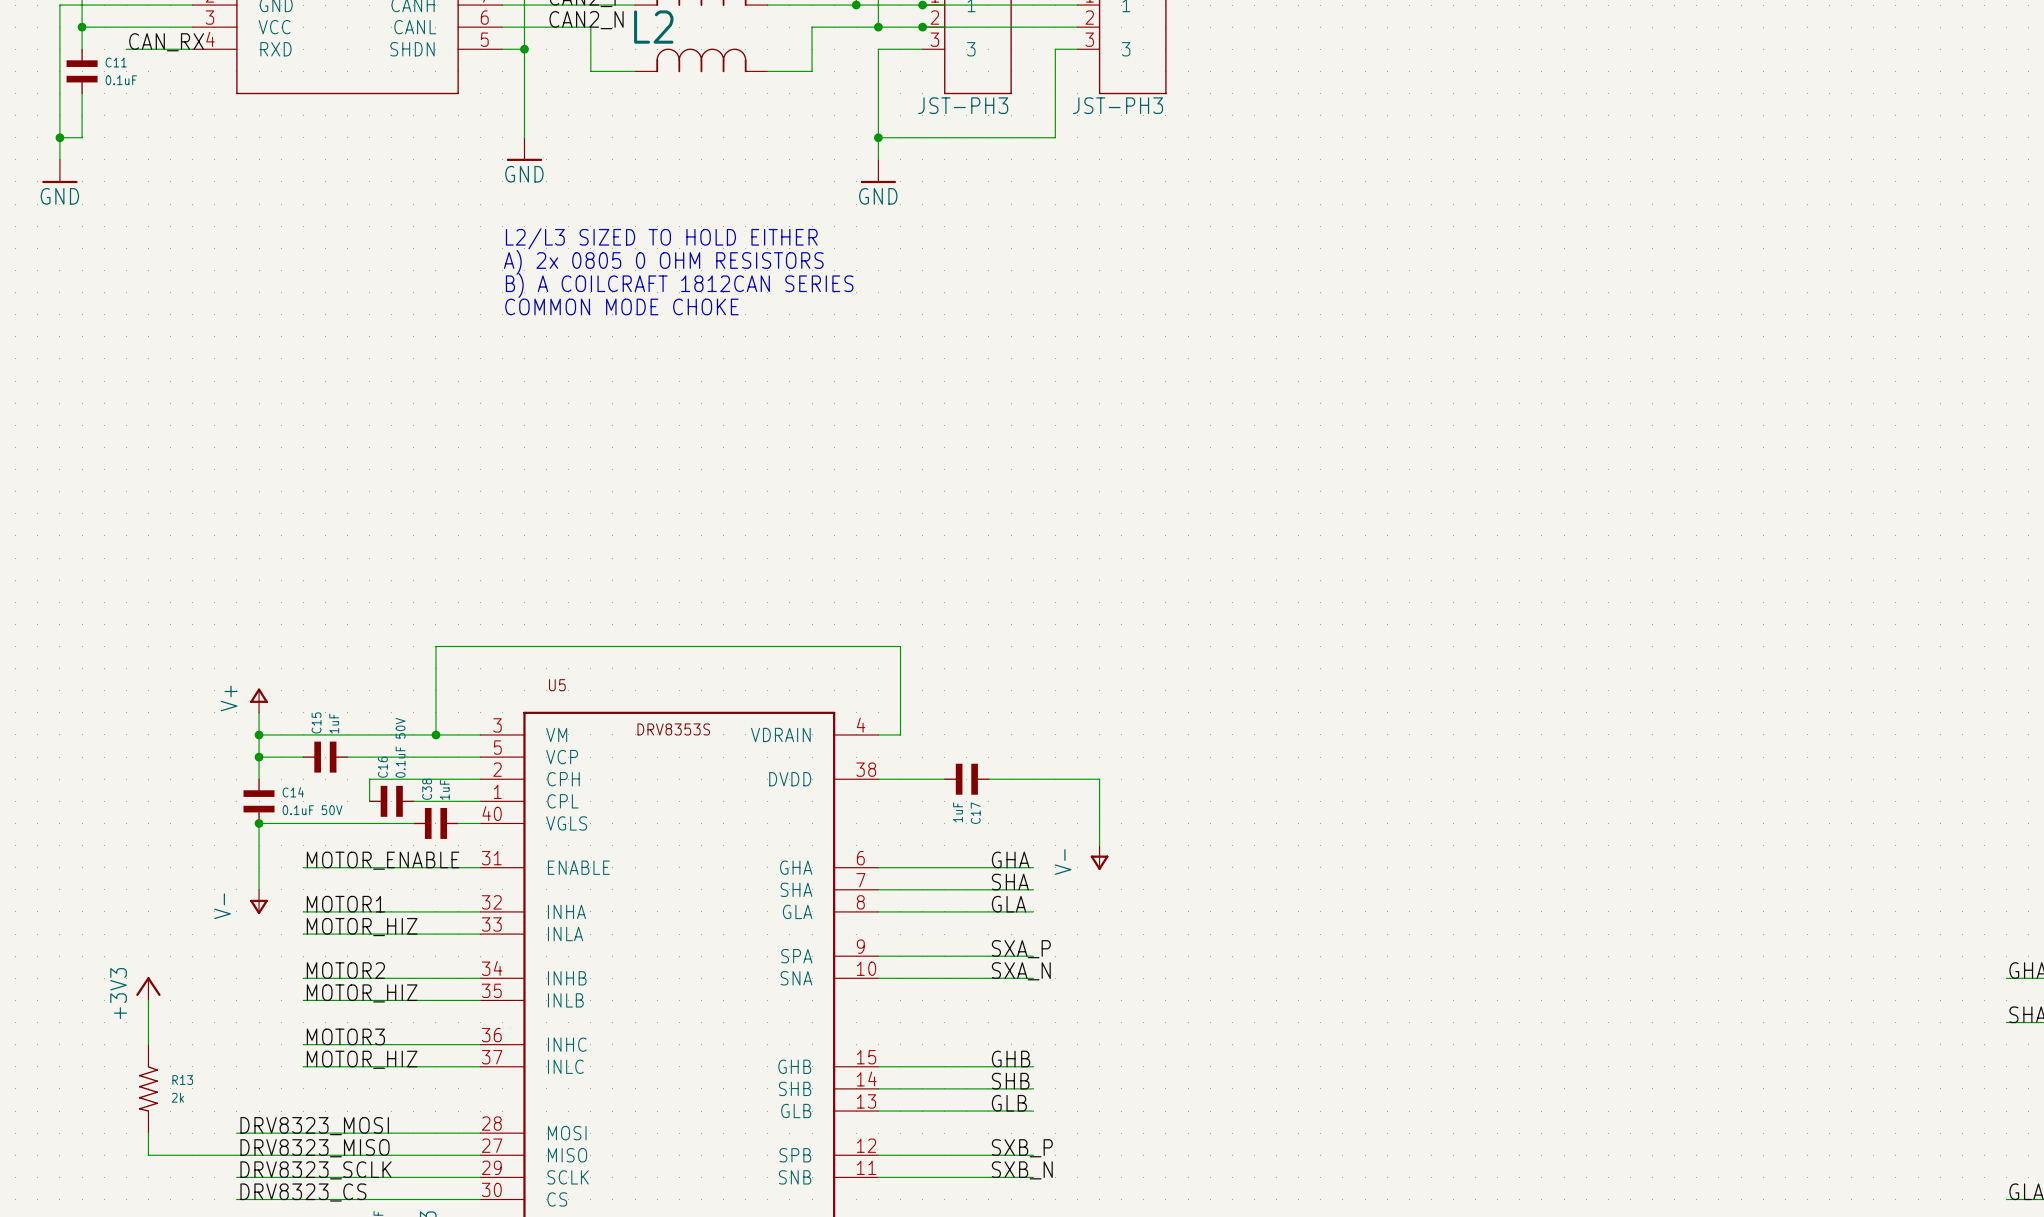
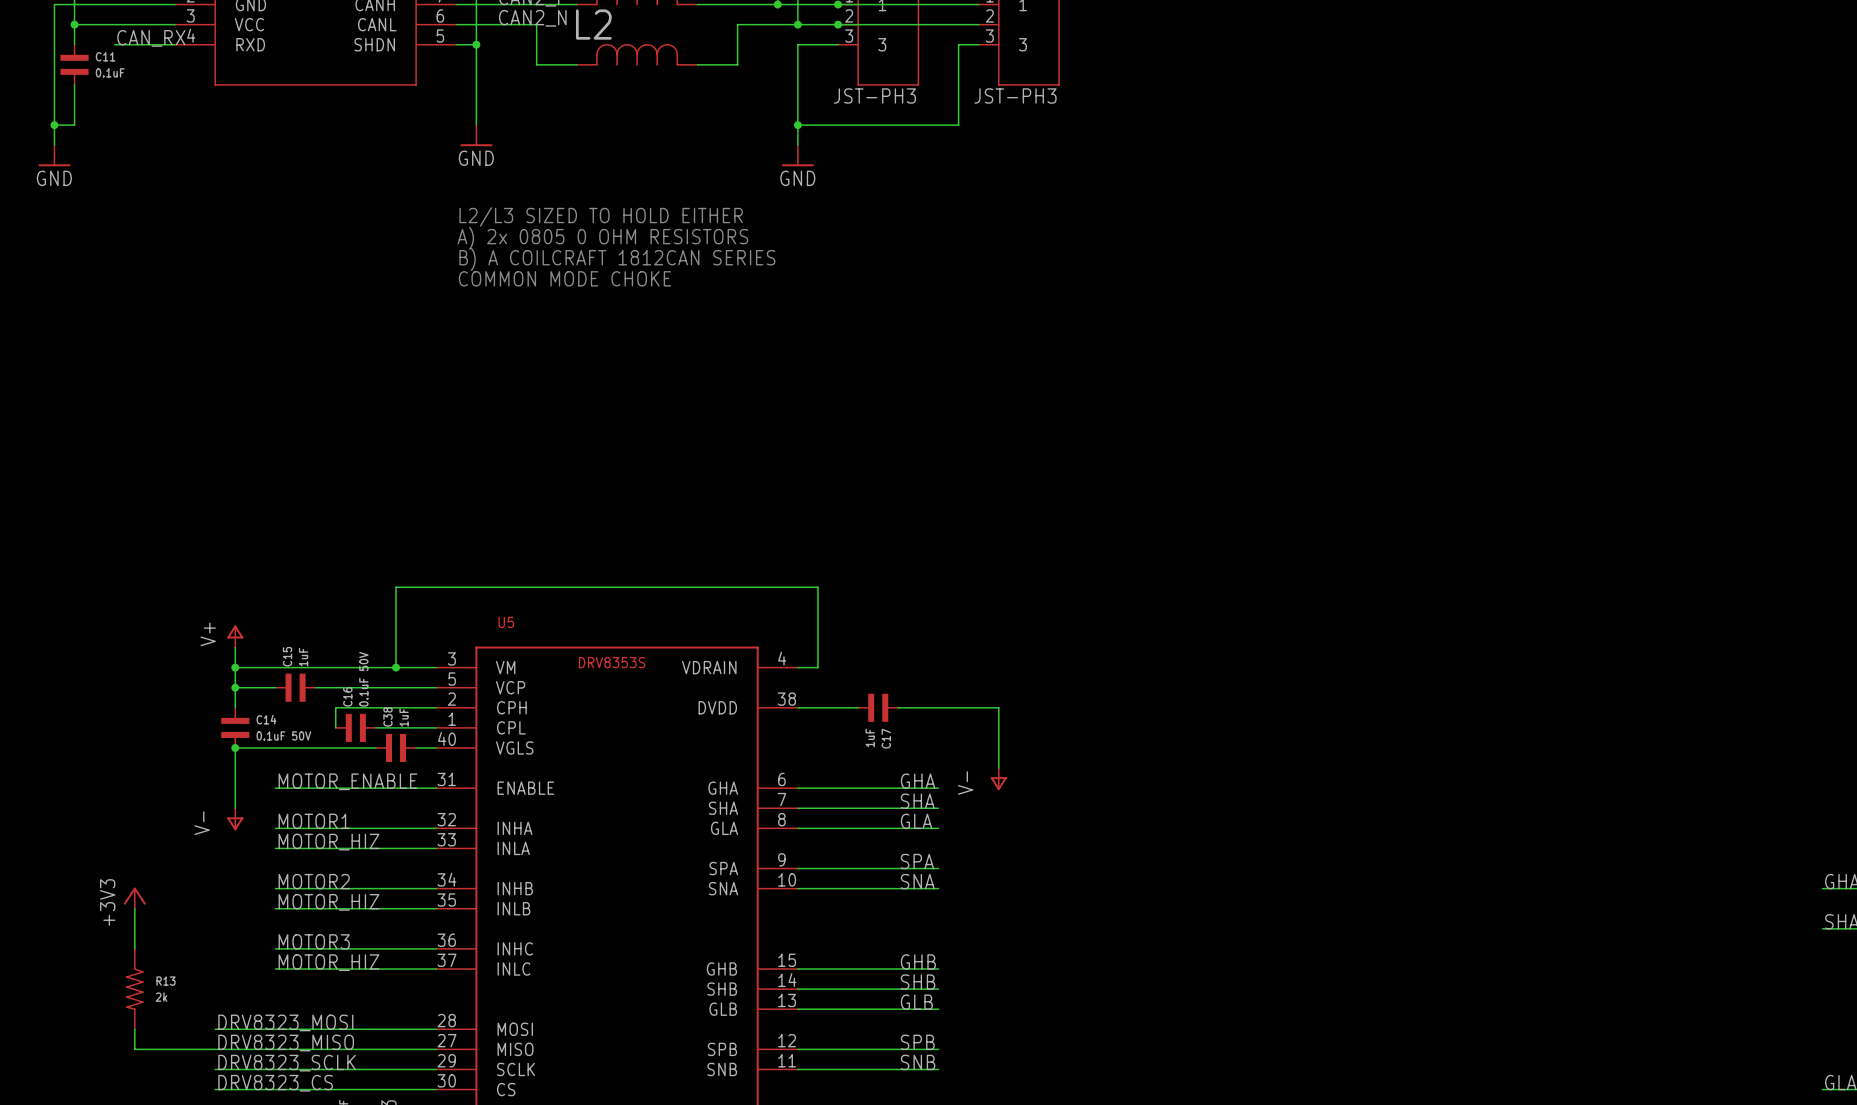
label: SXA_P (1021, 949) -> SPA (917, 861)
label: SXA_N (1021, 971) -> SNA (917, 881)
label: SXB_P (1022, 1148) -> SPB (917, 1042)
label: SXB_N (1022, 1170) -> SNB (918, 1062)

